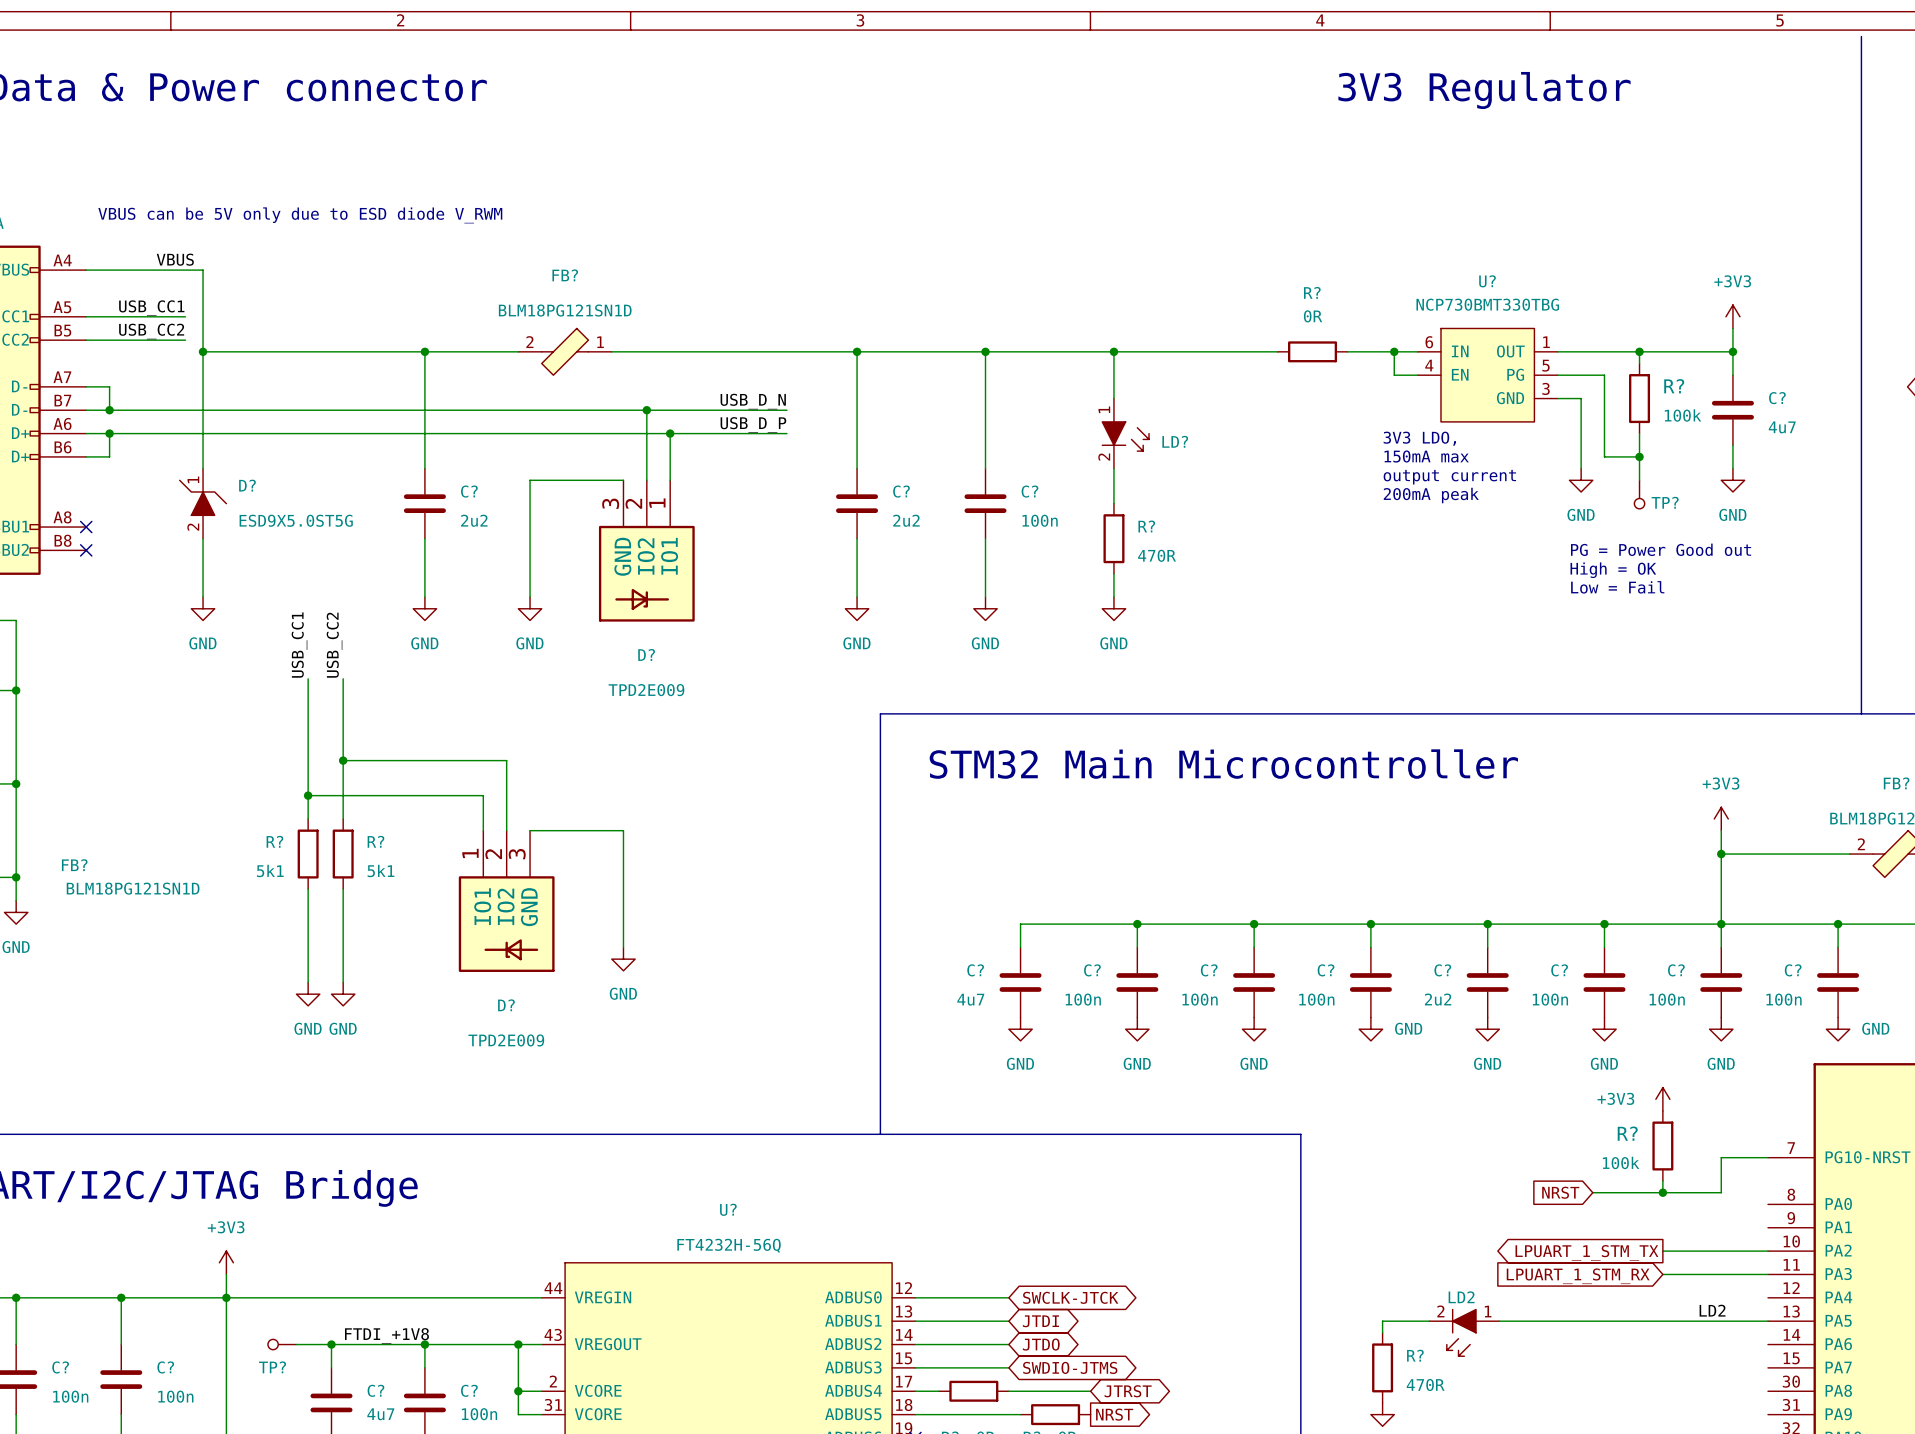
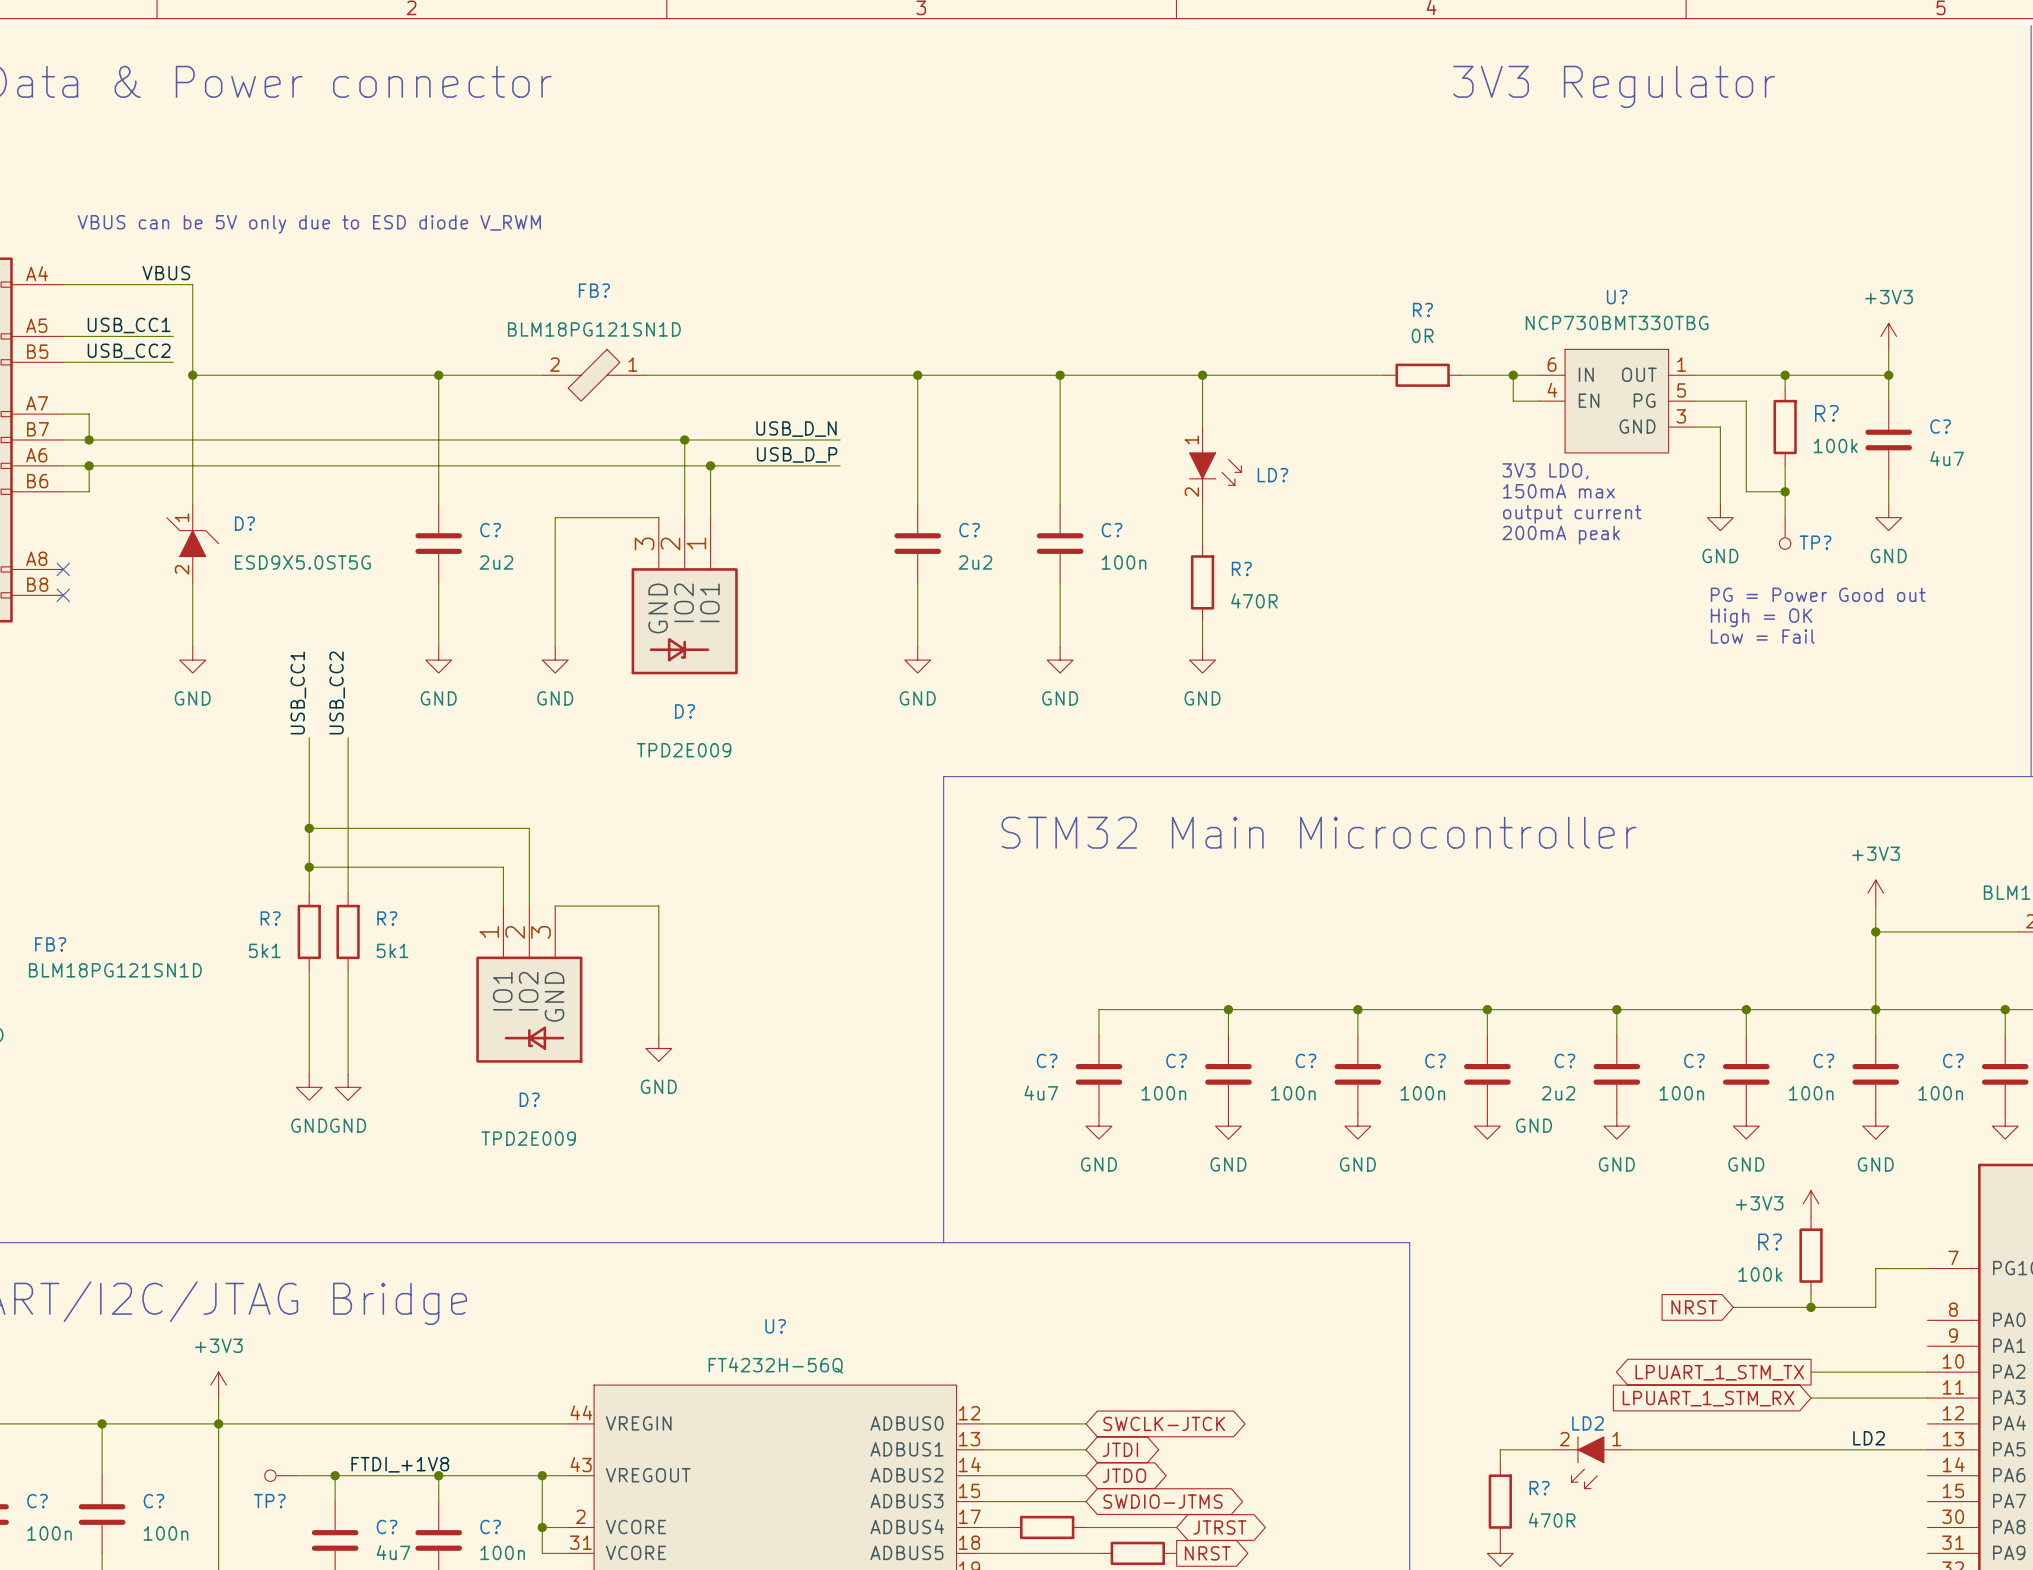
wire: none -> (309, 828) (348, 828)
junction position: (343, 760) -> (309, 828)

